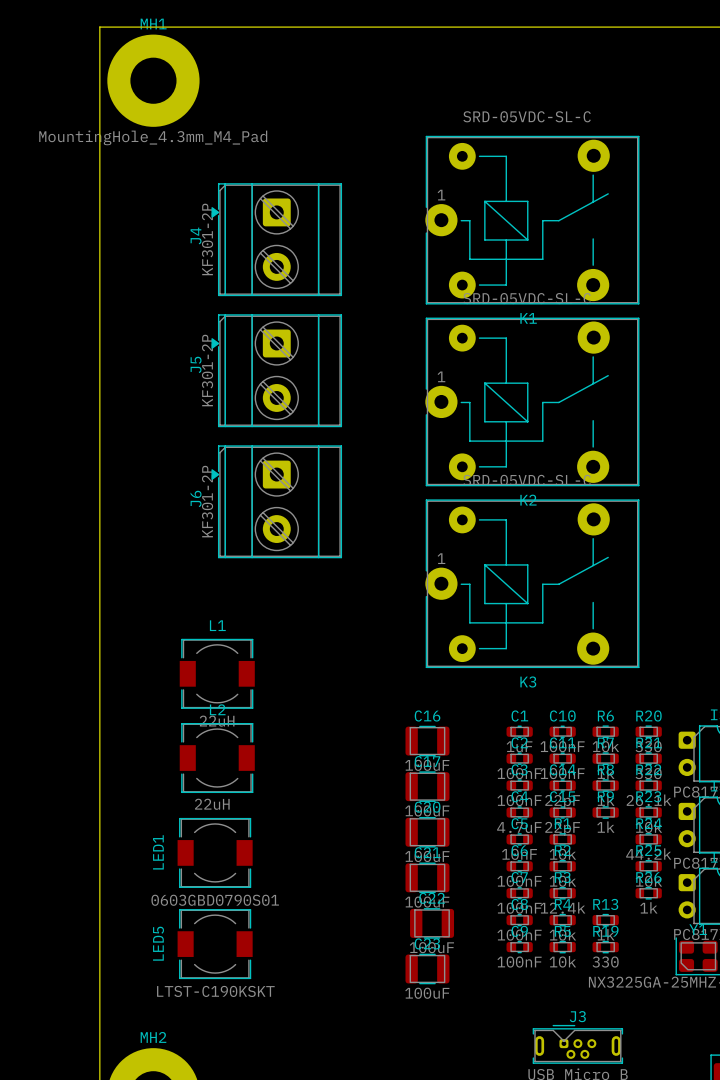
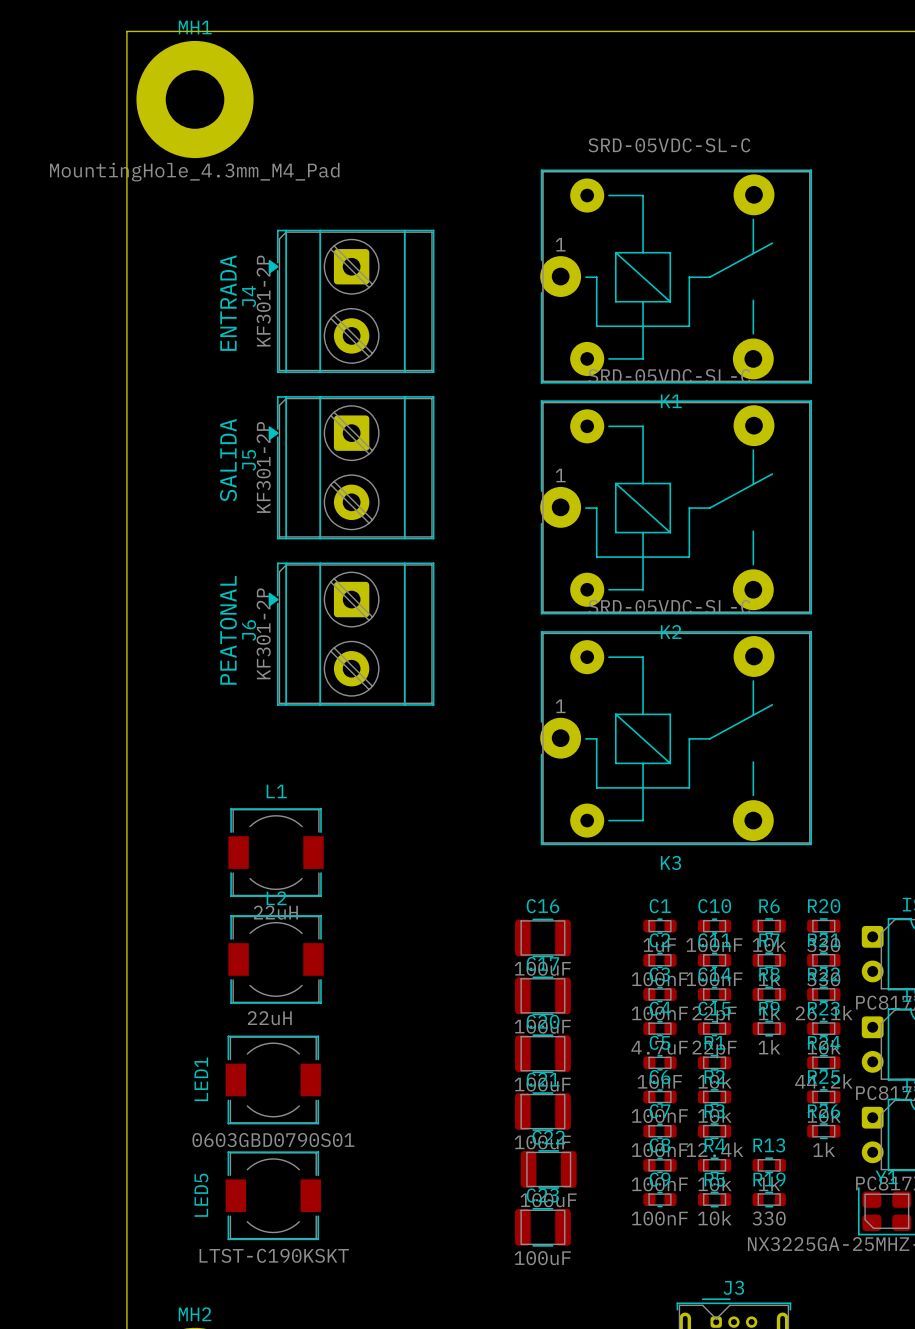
text: none -> ENTRADA (228, 303)
text: none -> SALIDA (228, 460)
text: none -> PEATONAL (228, 630)

